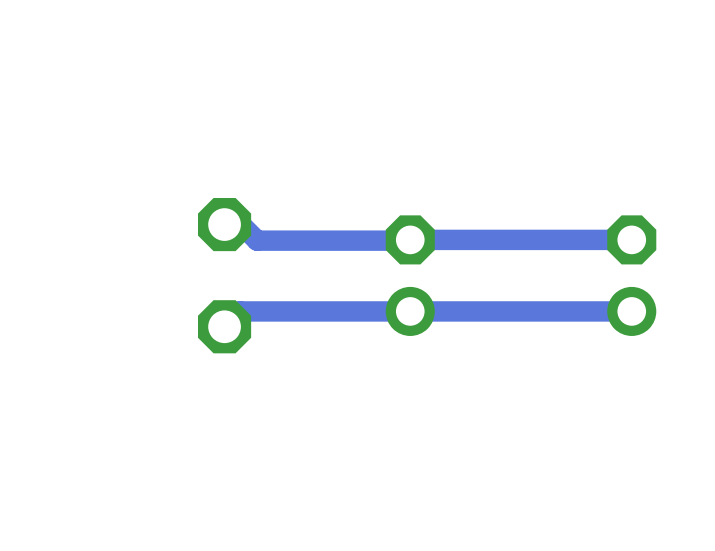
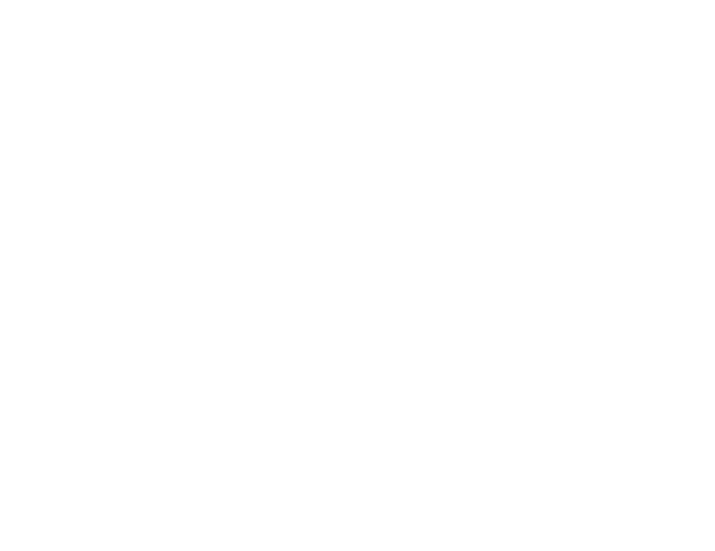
track: (224, 224) (241, 224) (257, 240) (631, 239) -> none
part: (224, 275) -> none
part: (410, 275) -> none
part: (631, 275) -> none
track: (631, 311) (239, 311) (224, 326) -> none

